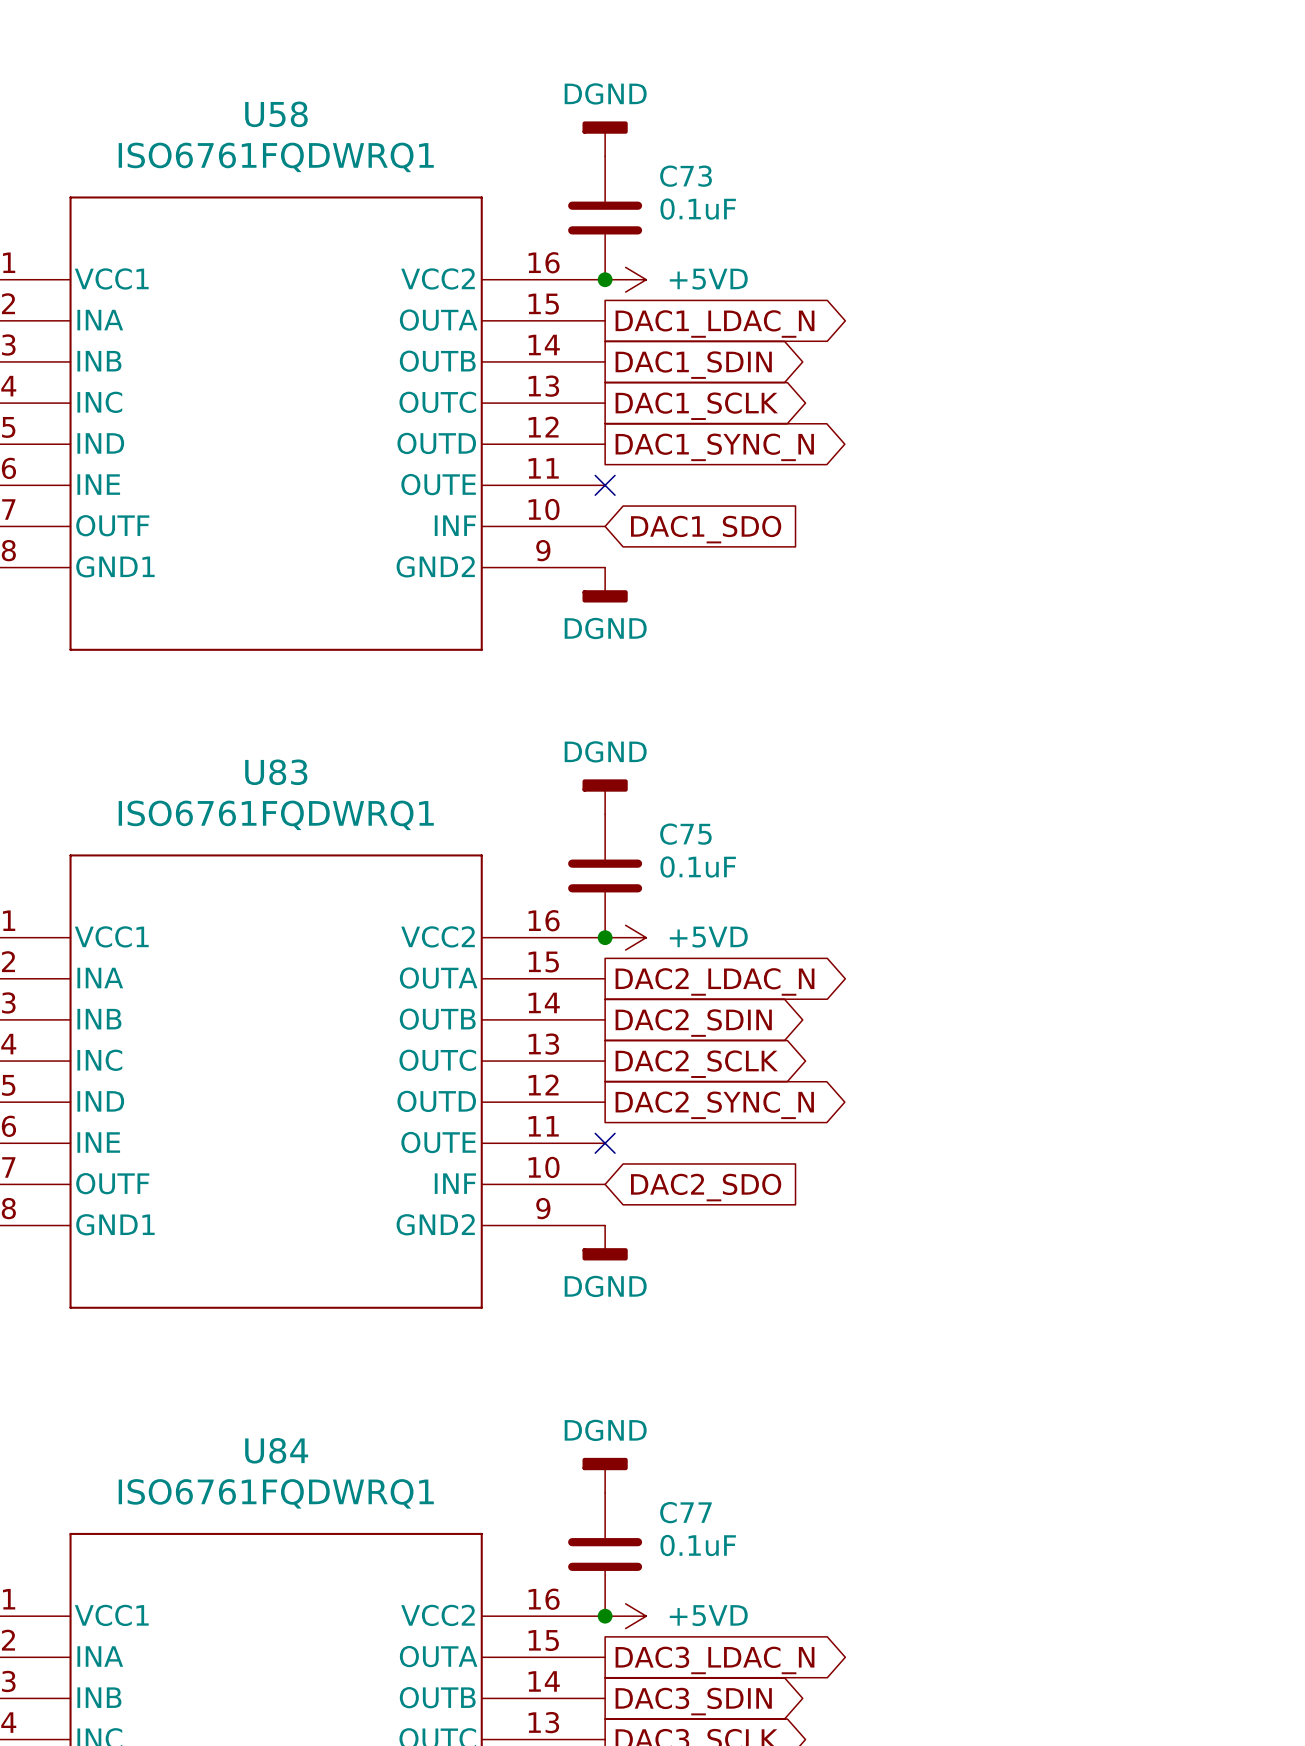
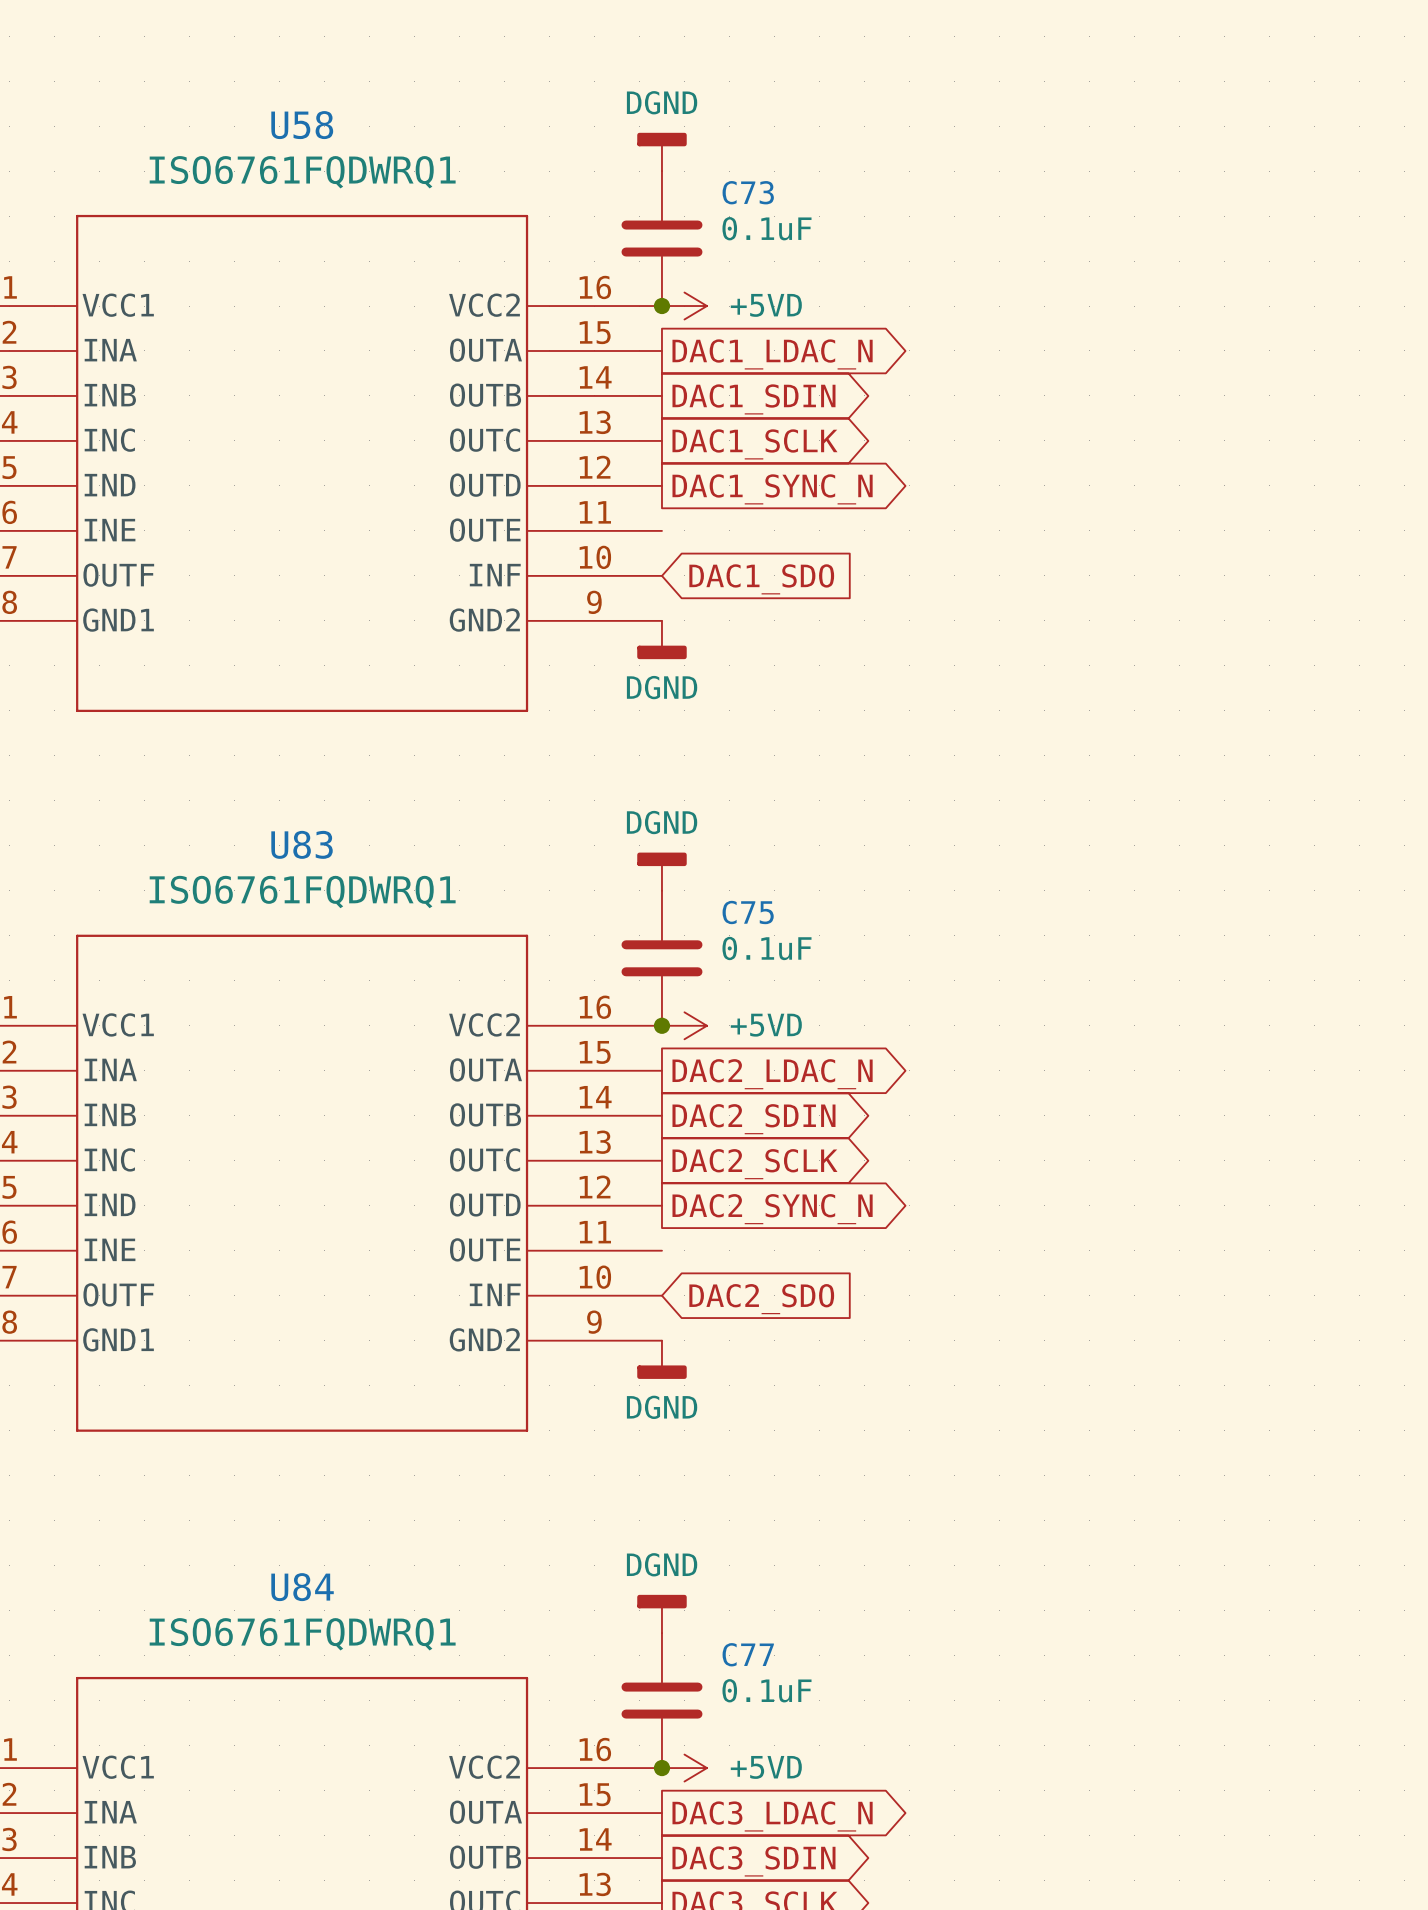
no-connect mark: (605, 485) -> none
no-connect mark: (605, 1143) -> none

